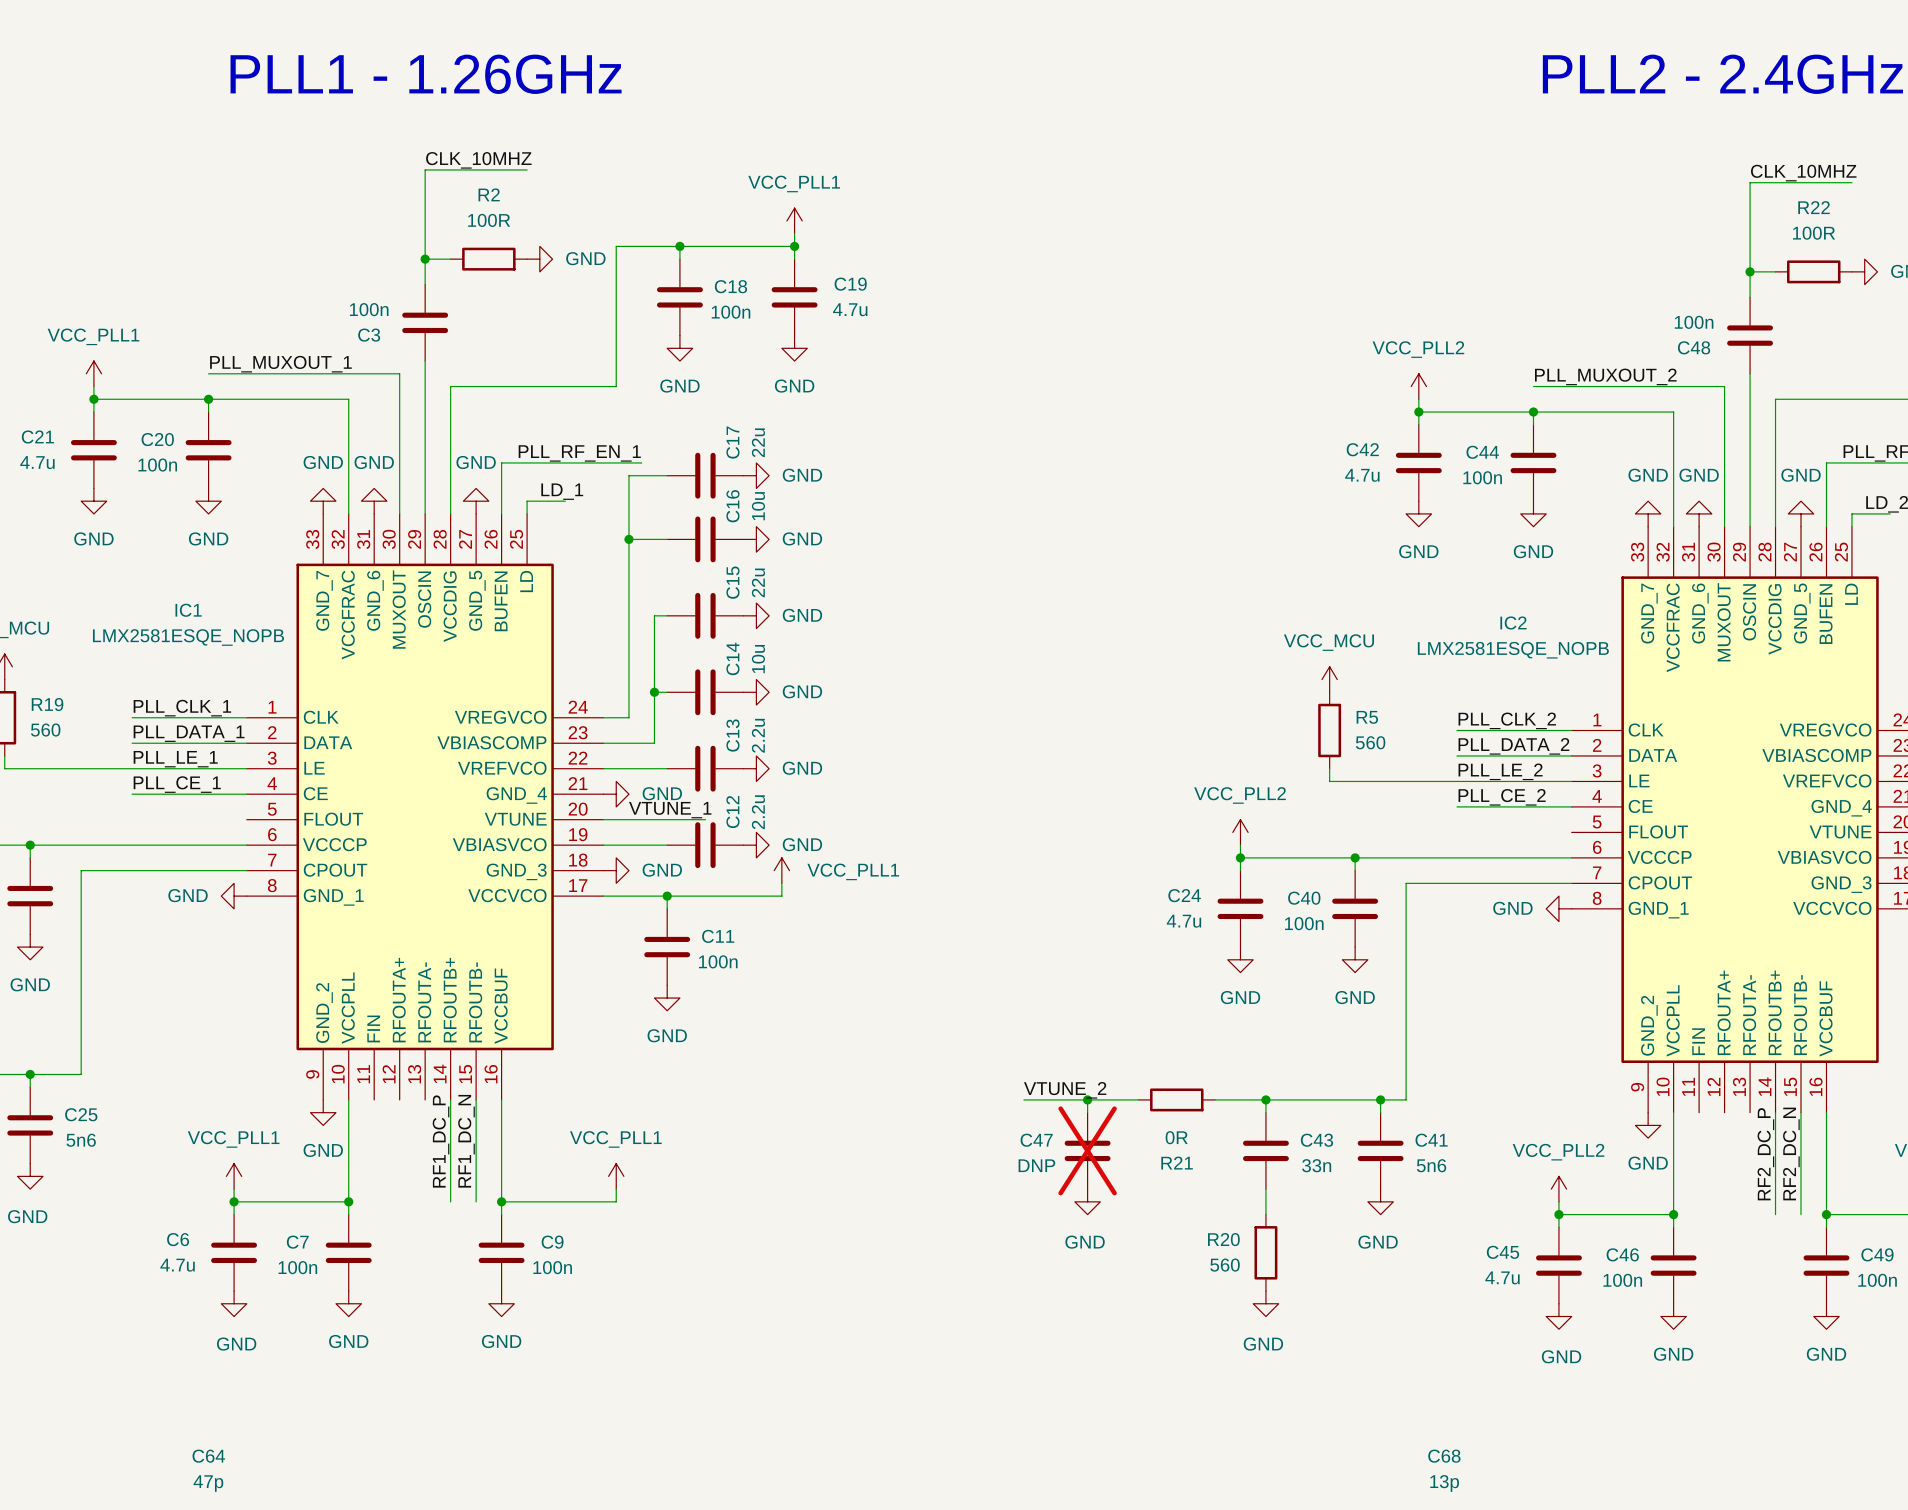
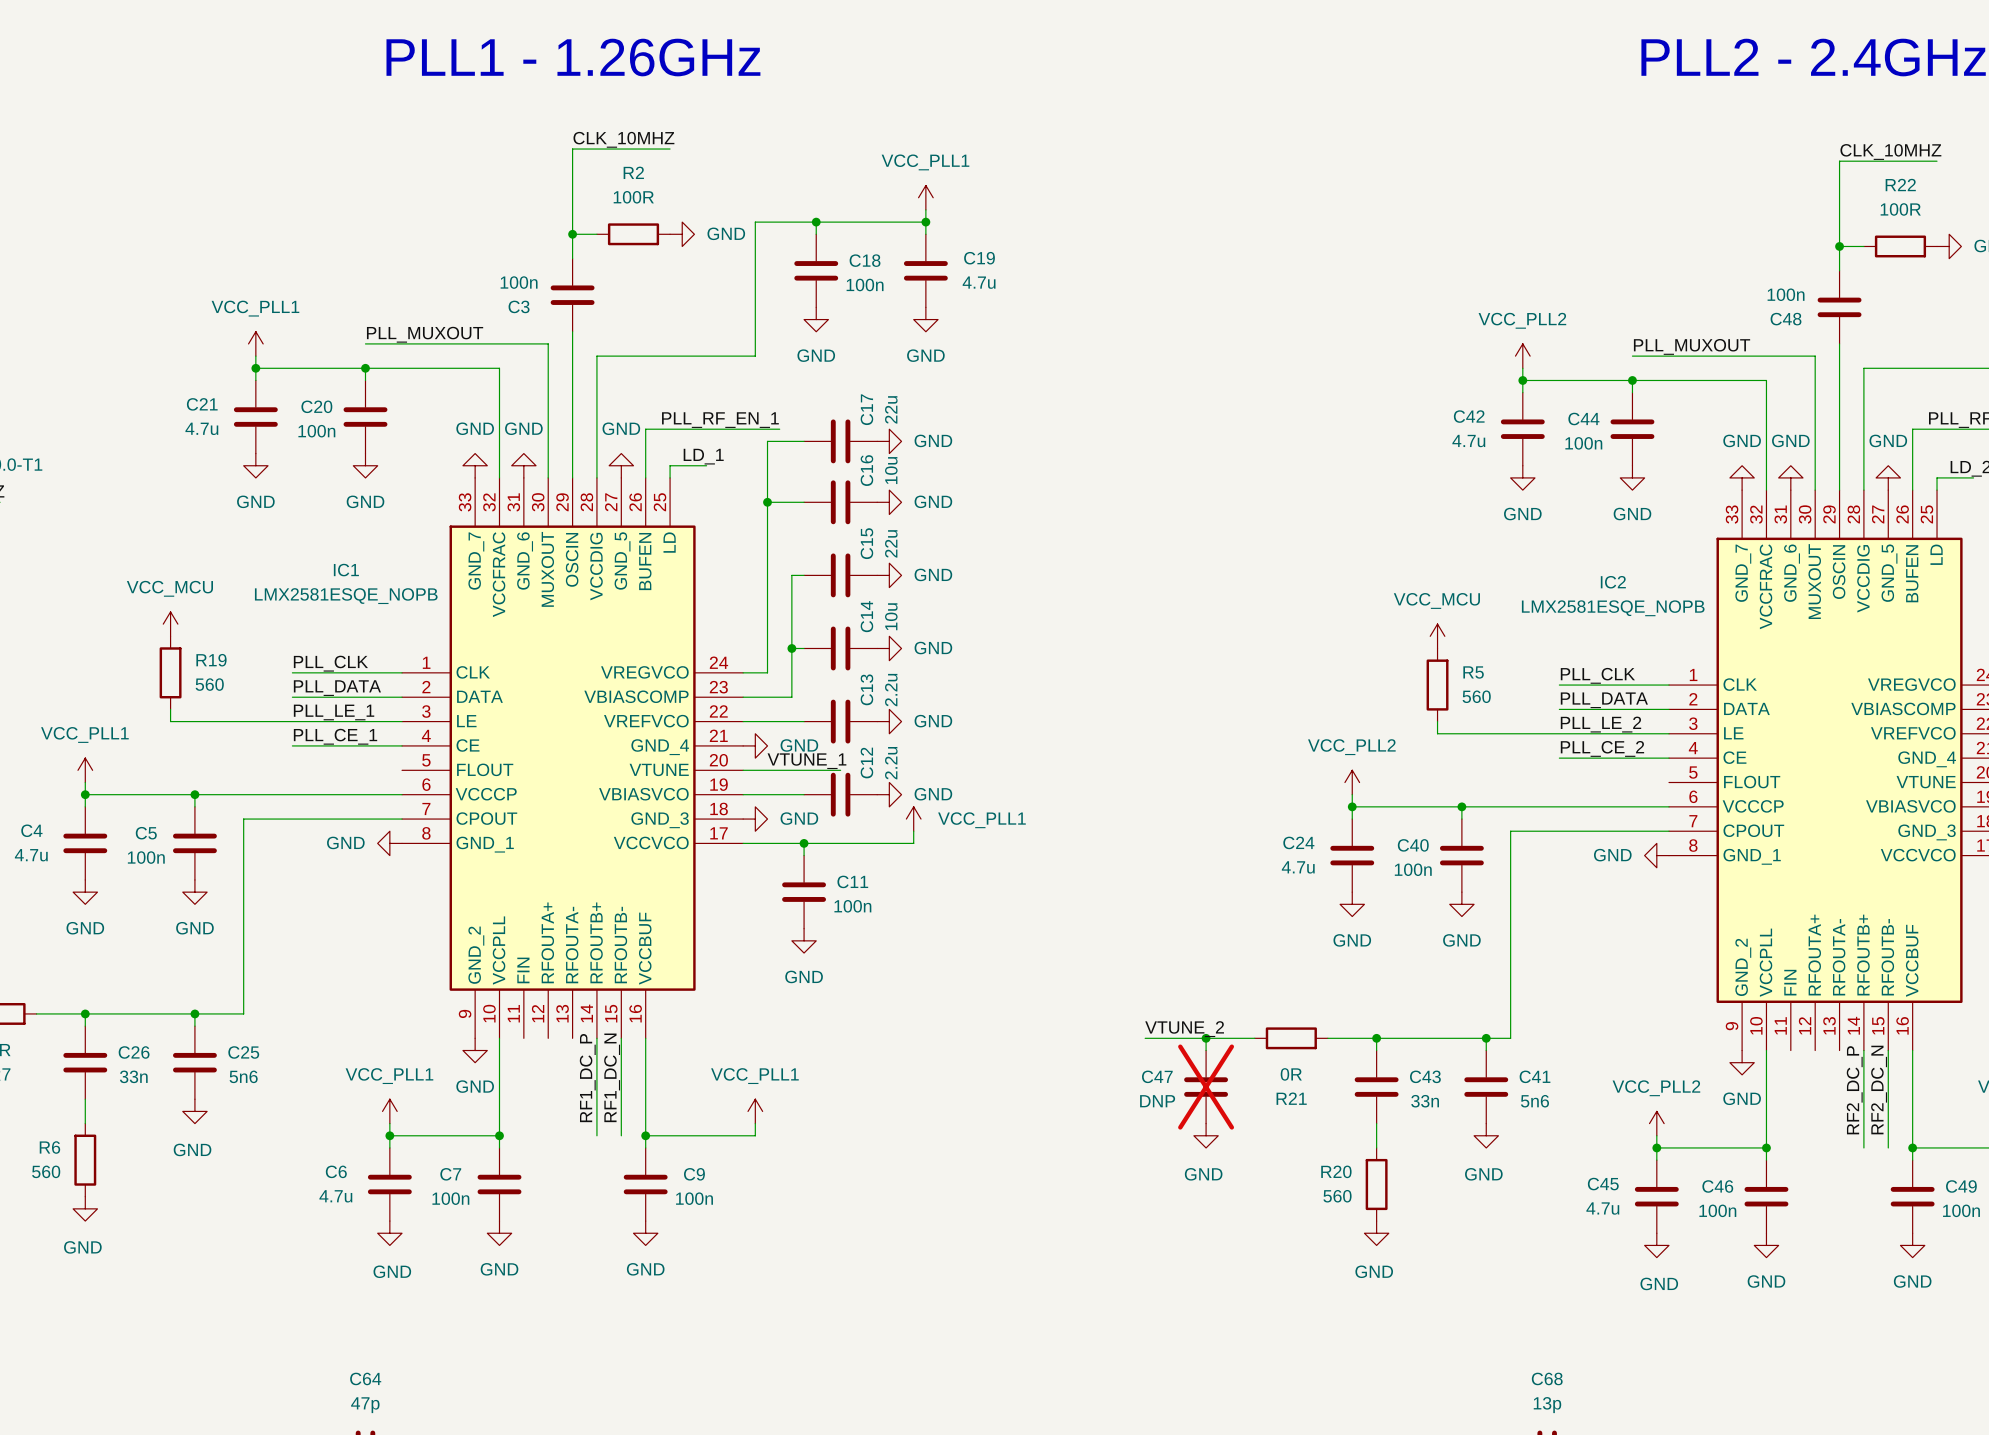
label: PLL_MUXOUT_1 (280, 364) -> PLL_MUXOUT (425, 334)
label: PLL_MUXOUT_2 (1605, 376) -> PLL_MUXOUT (1692, 346)
label: PLL_CLK_1 (182, 708) -> PLL_CLK (330, 663)
label: PLL_CLK_2 (1507, 720) -> PLL_CLK (1597, 675)
label: PLL_DATA_1 (189, 733) -> PLL_DATA (337, 688)
label: PLL_DATA_2 (1513, 746) -> PLL_DATA (1604, 700)

